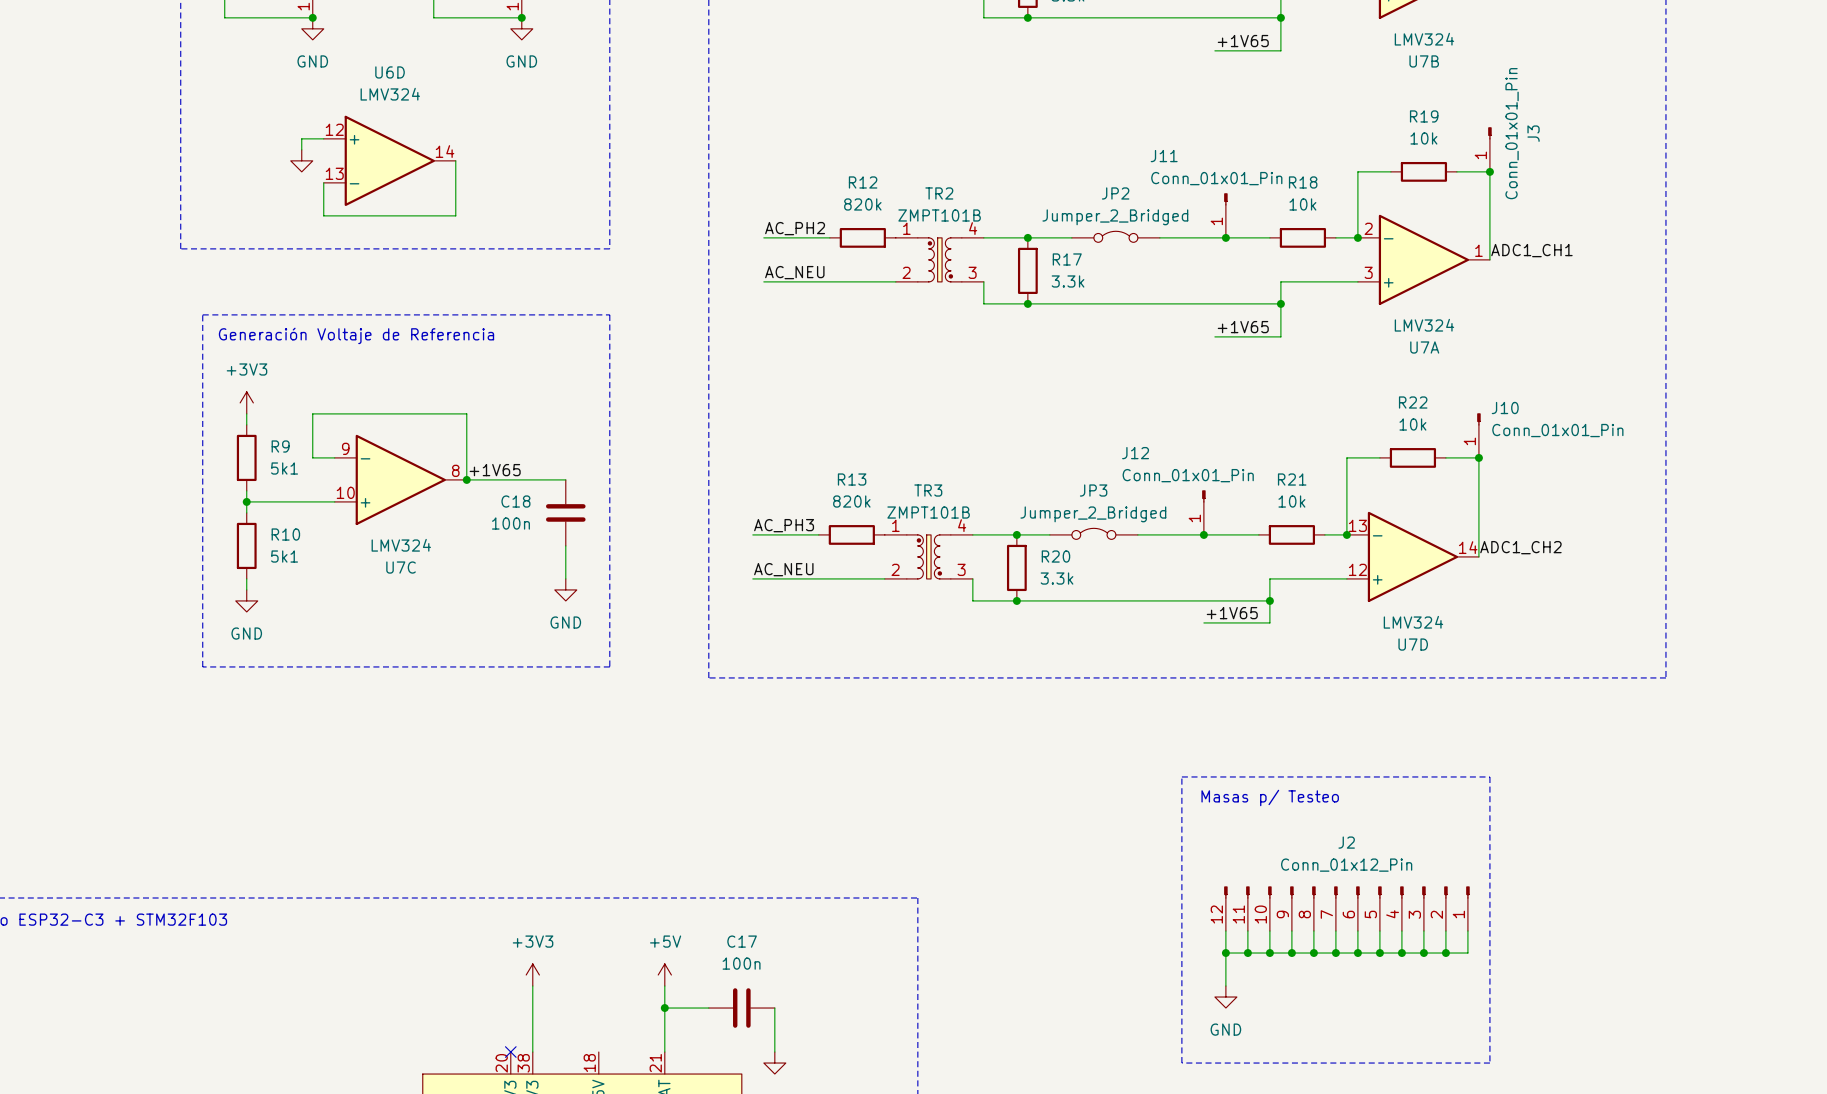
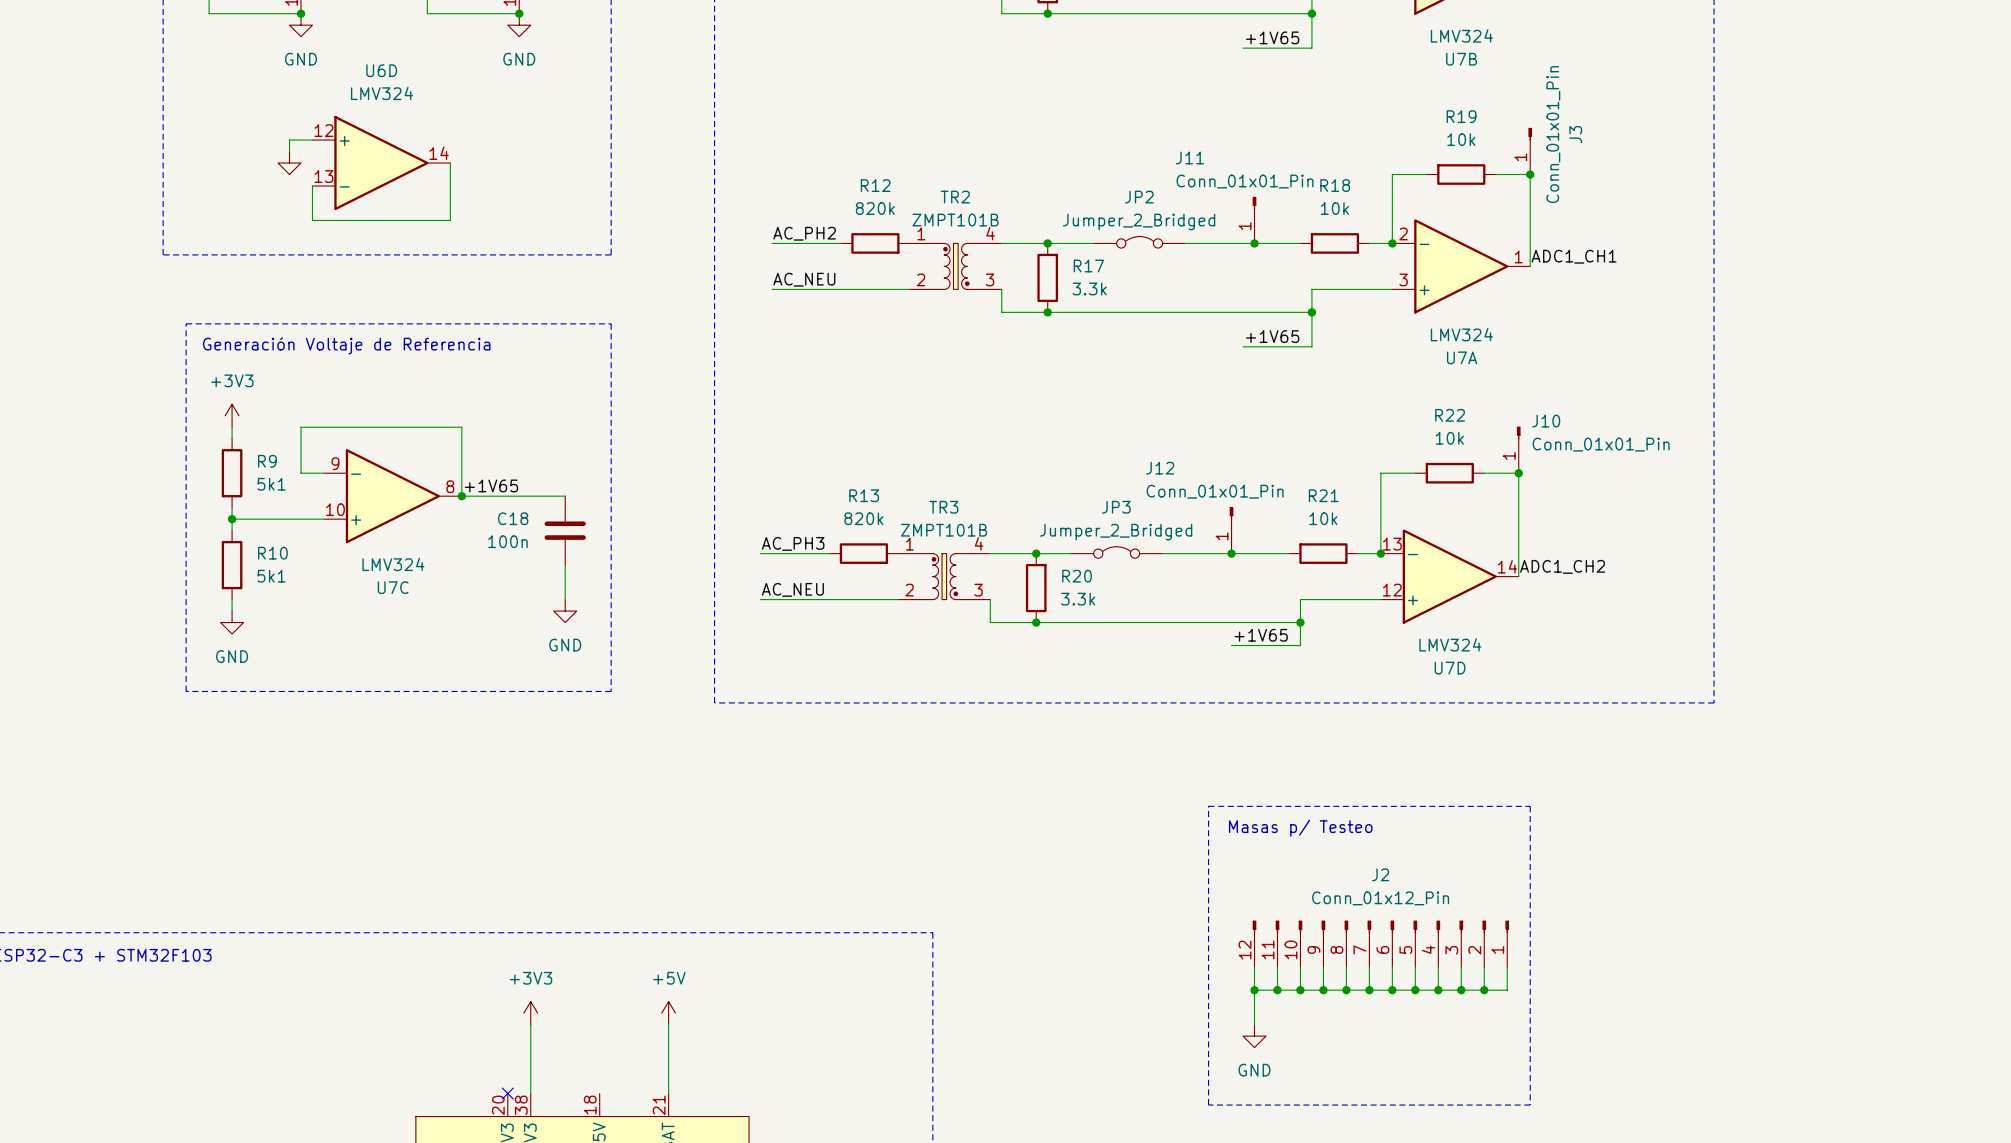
wire: (664, 1008) (708, 1008) -> none
junction: (664, 1008) -> none
C17: 100n (741, 1008) -> none
wire: (774, 1008) (774, 1052) -> none
power symbol: (774, 1063) -> none

